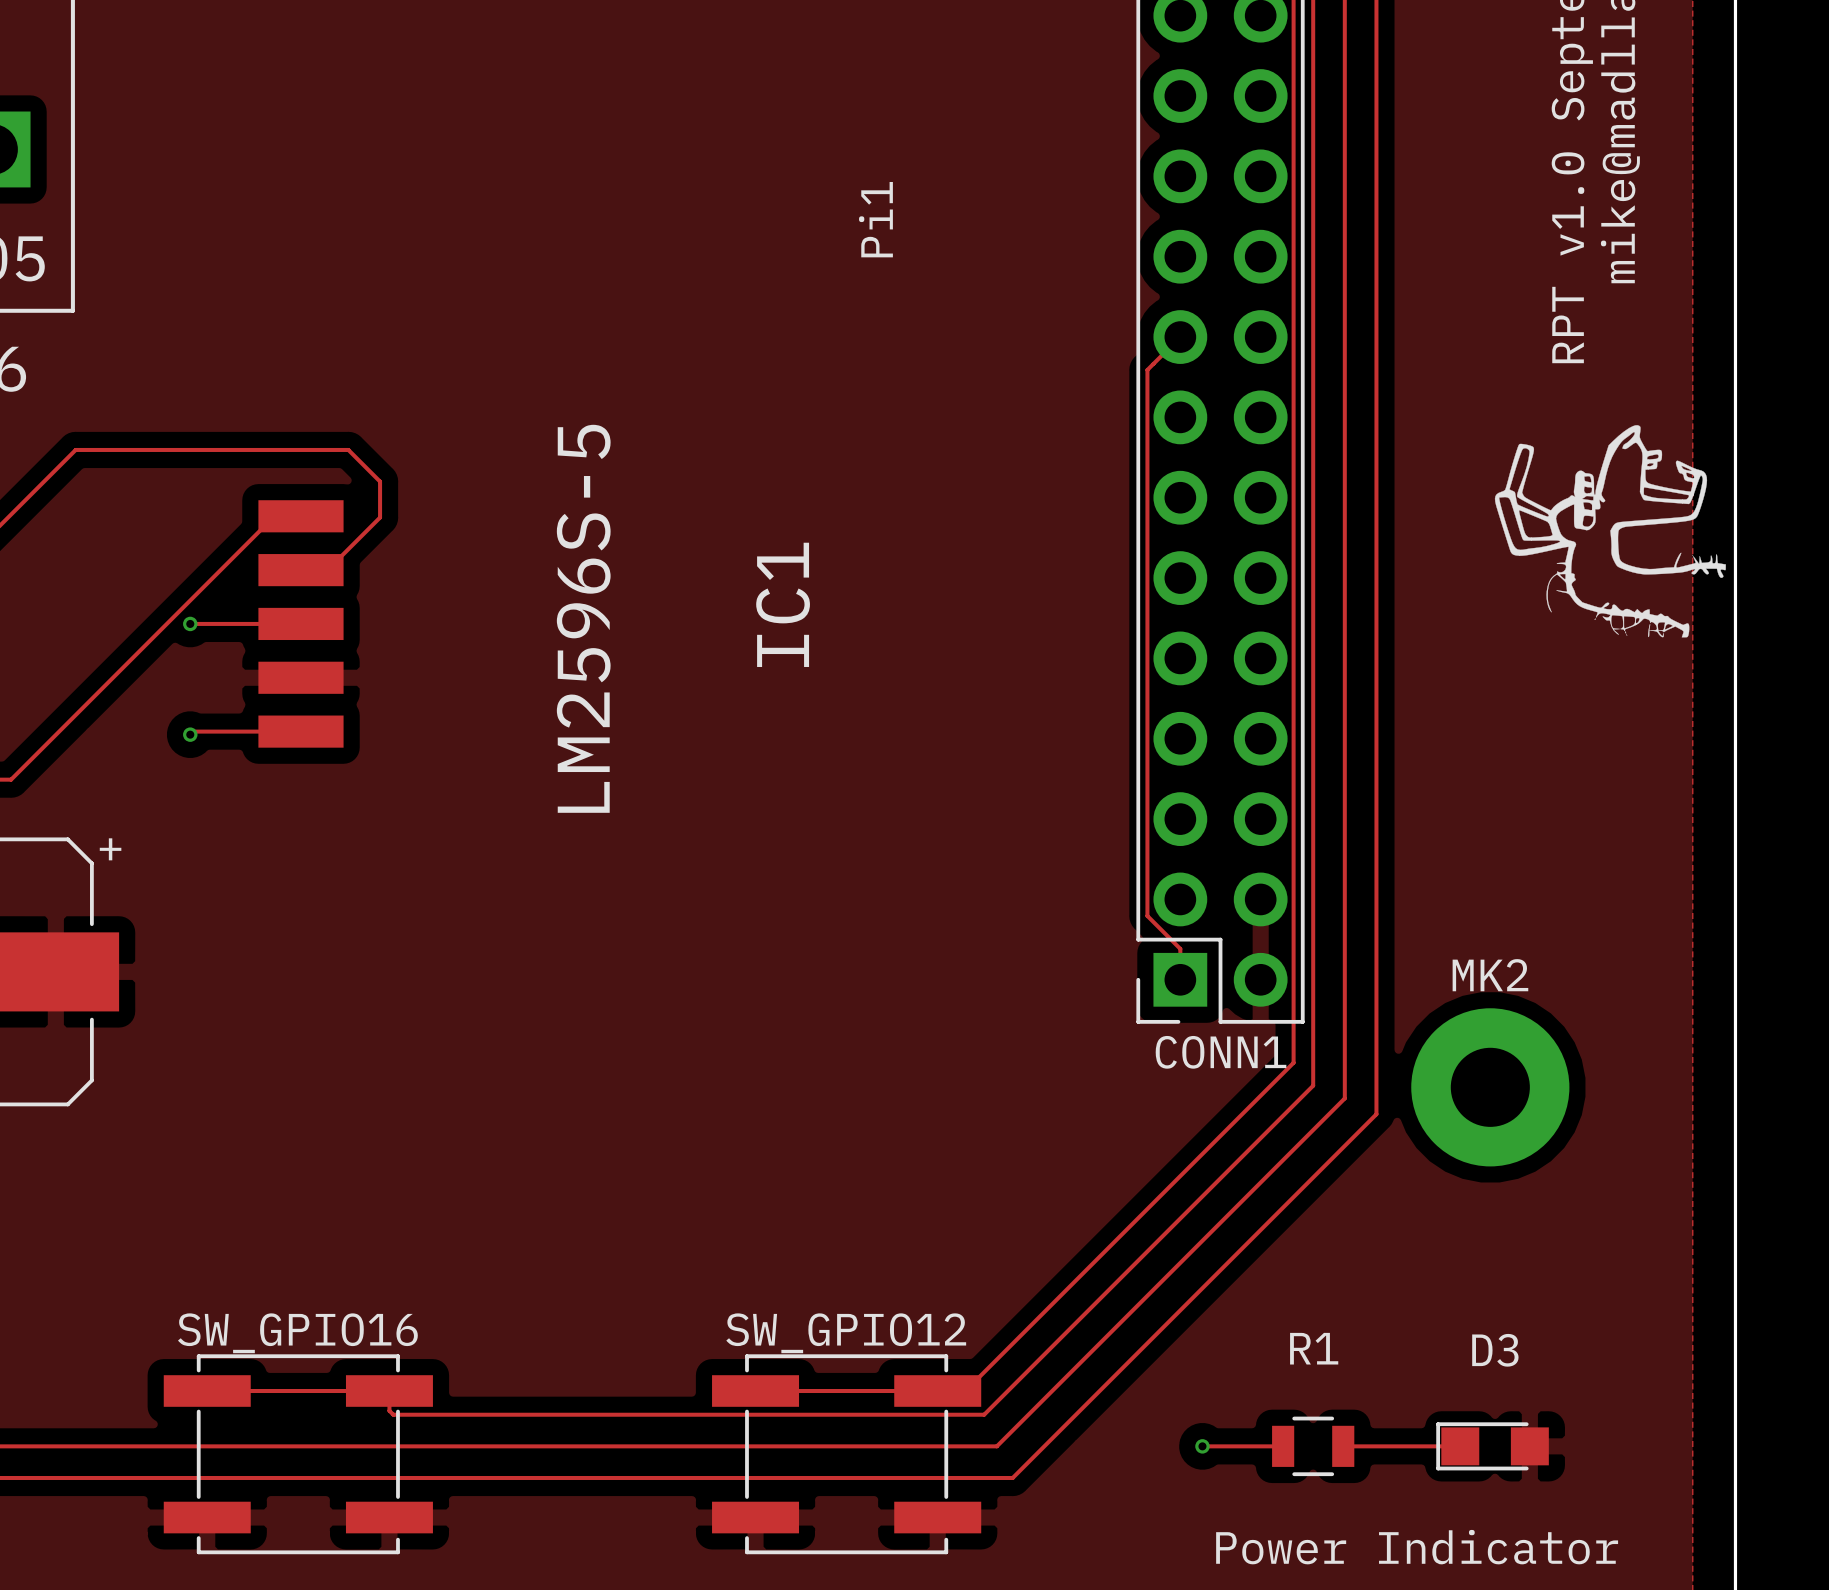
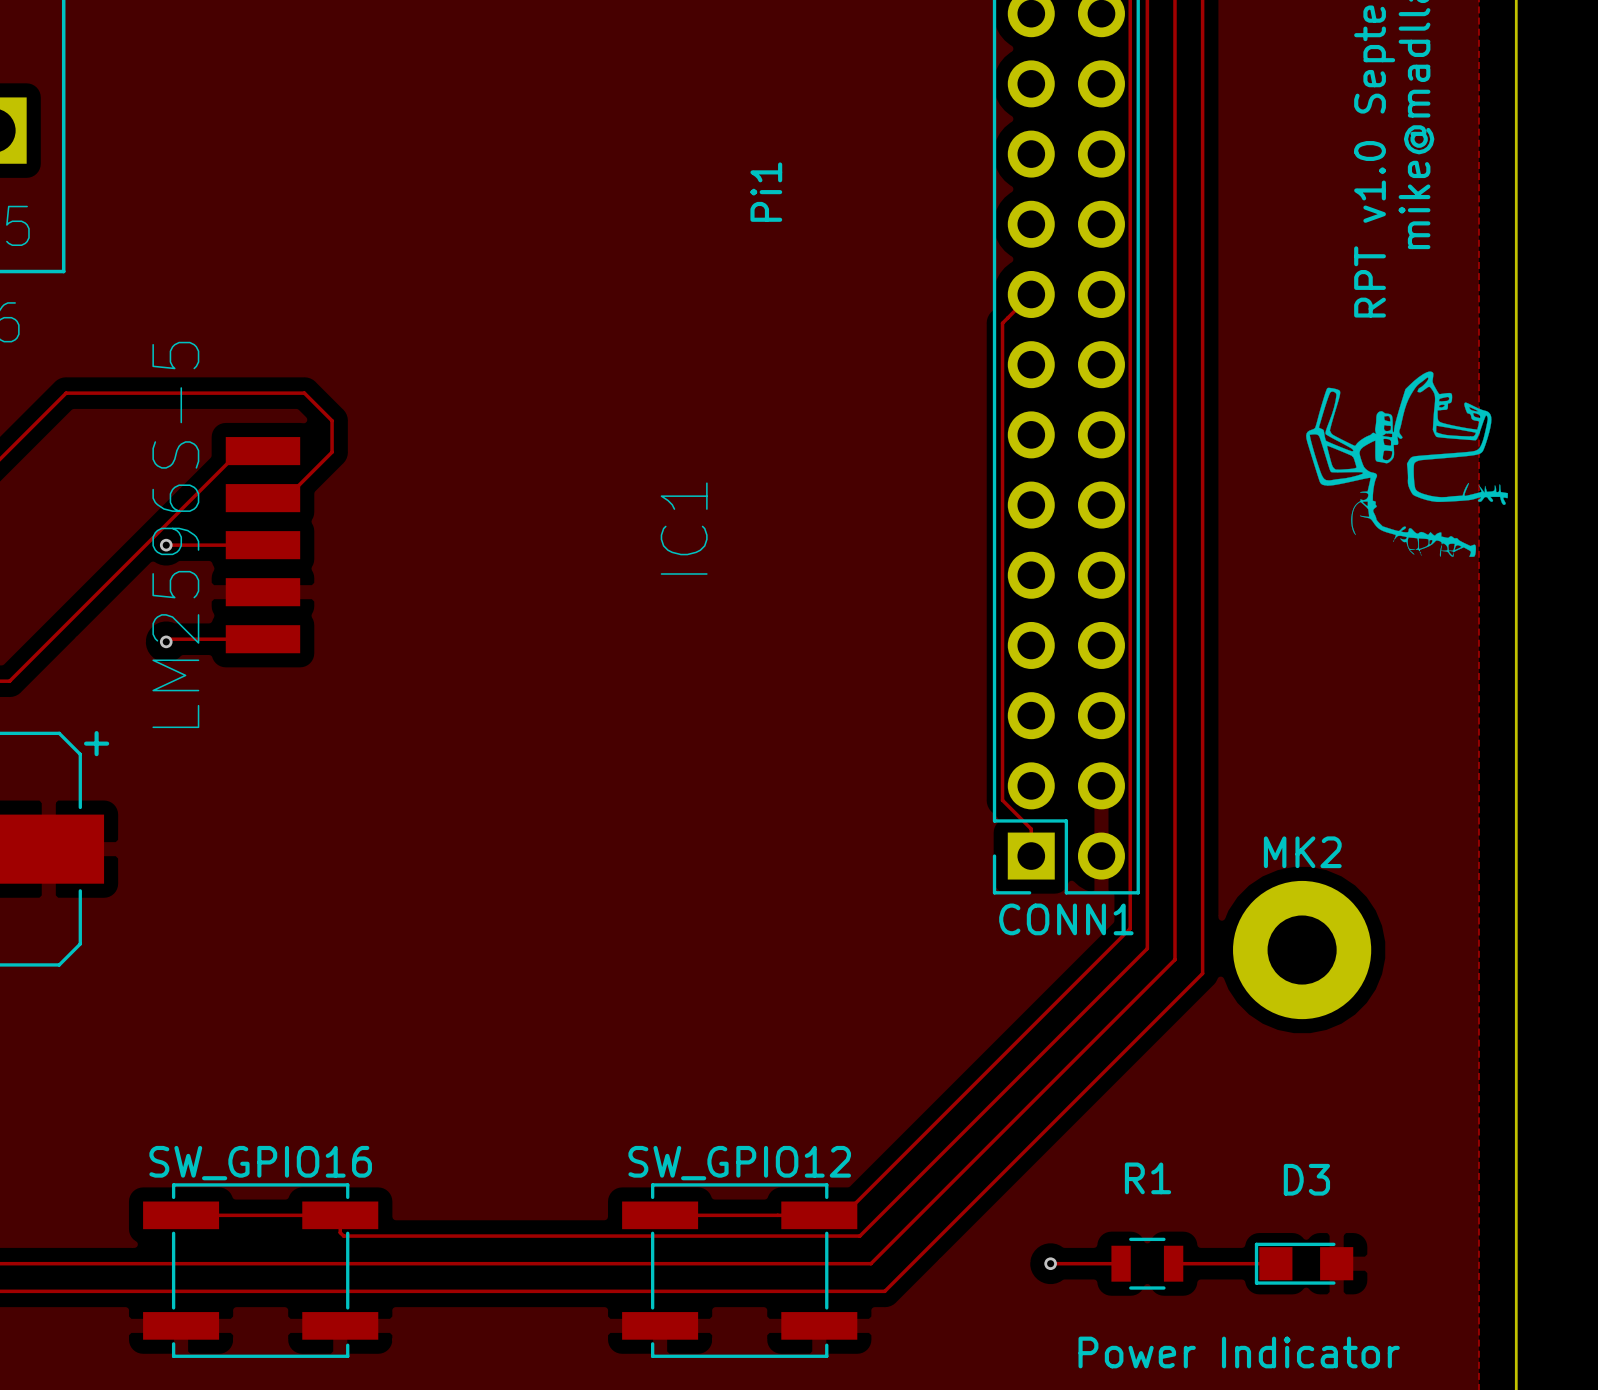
IC1 value position: LM2596S-5 (583, 618) -> LM2596S-5 (175, 534)

